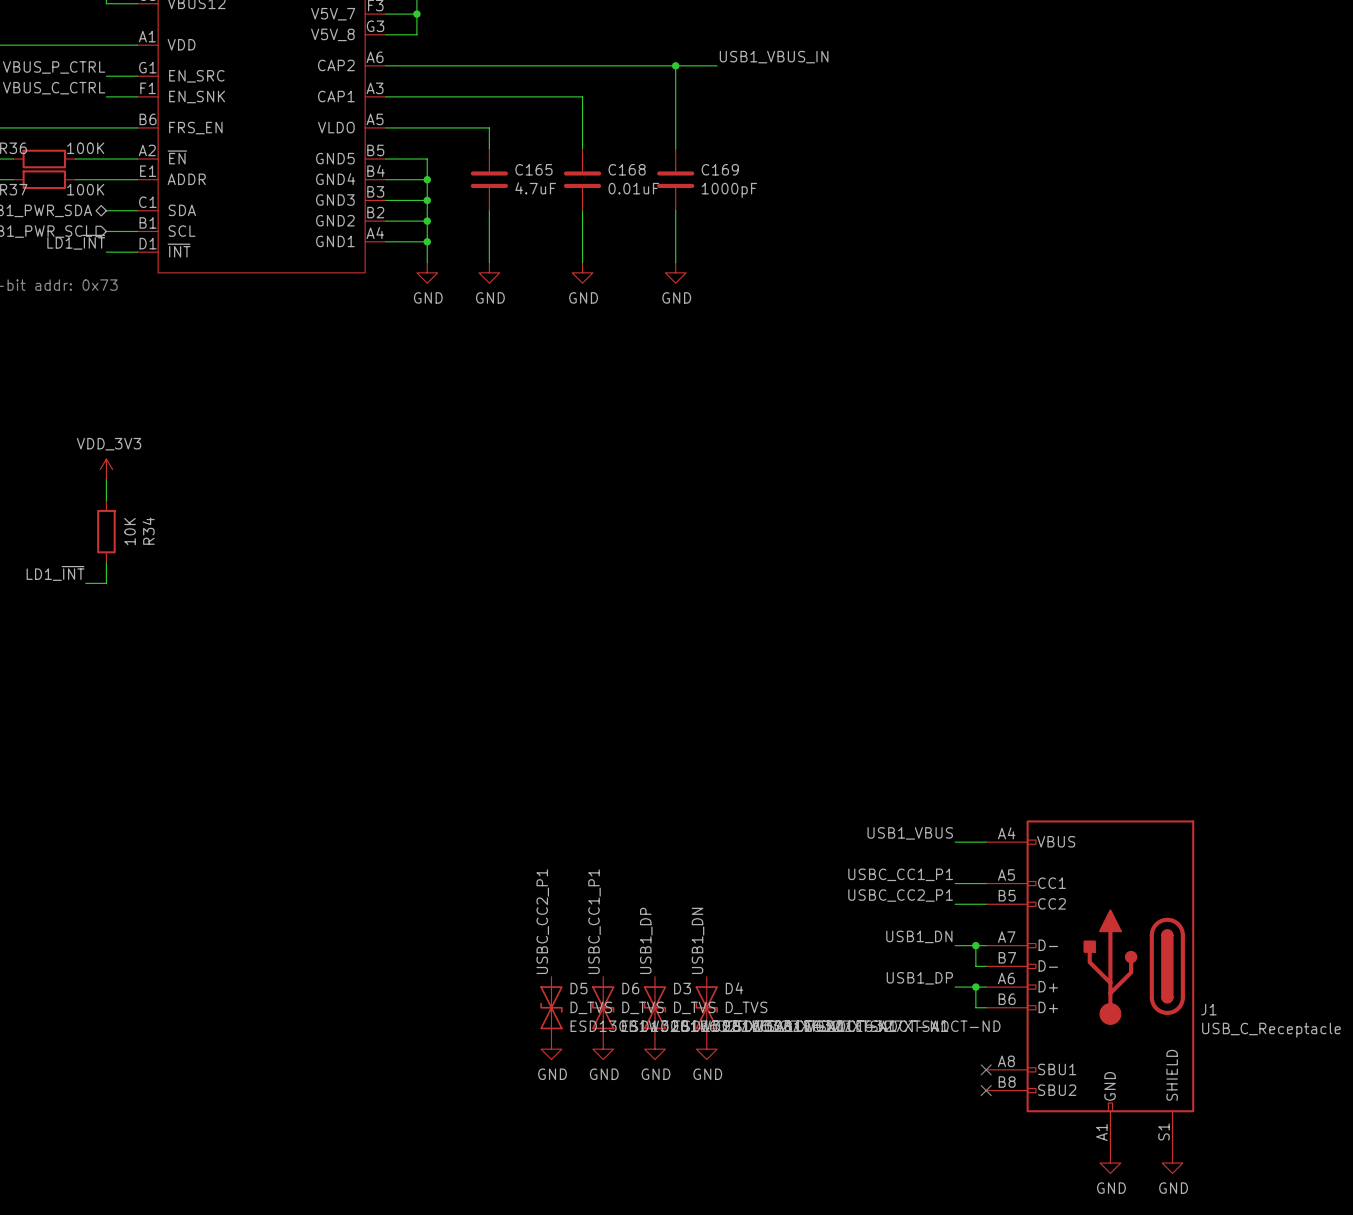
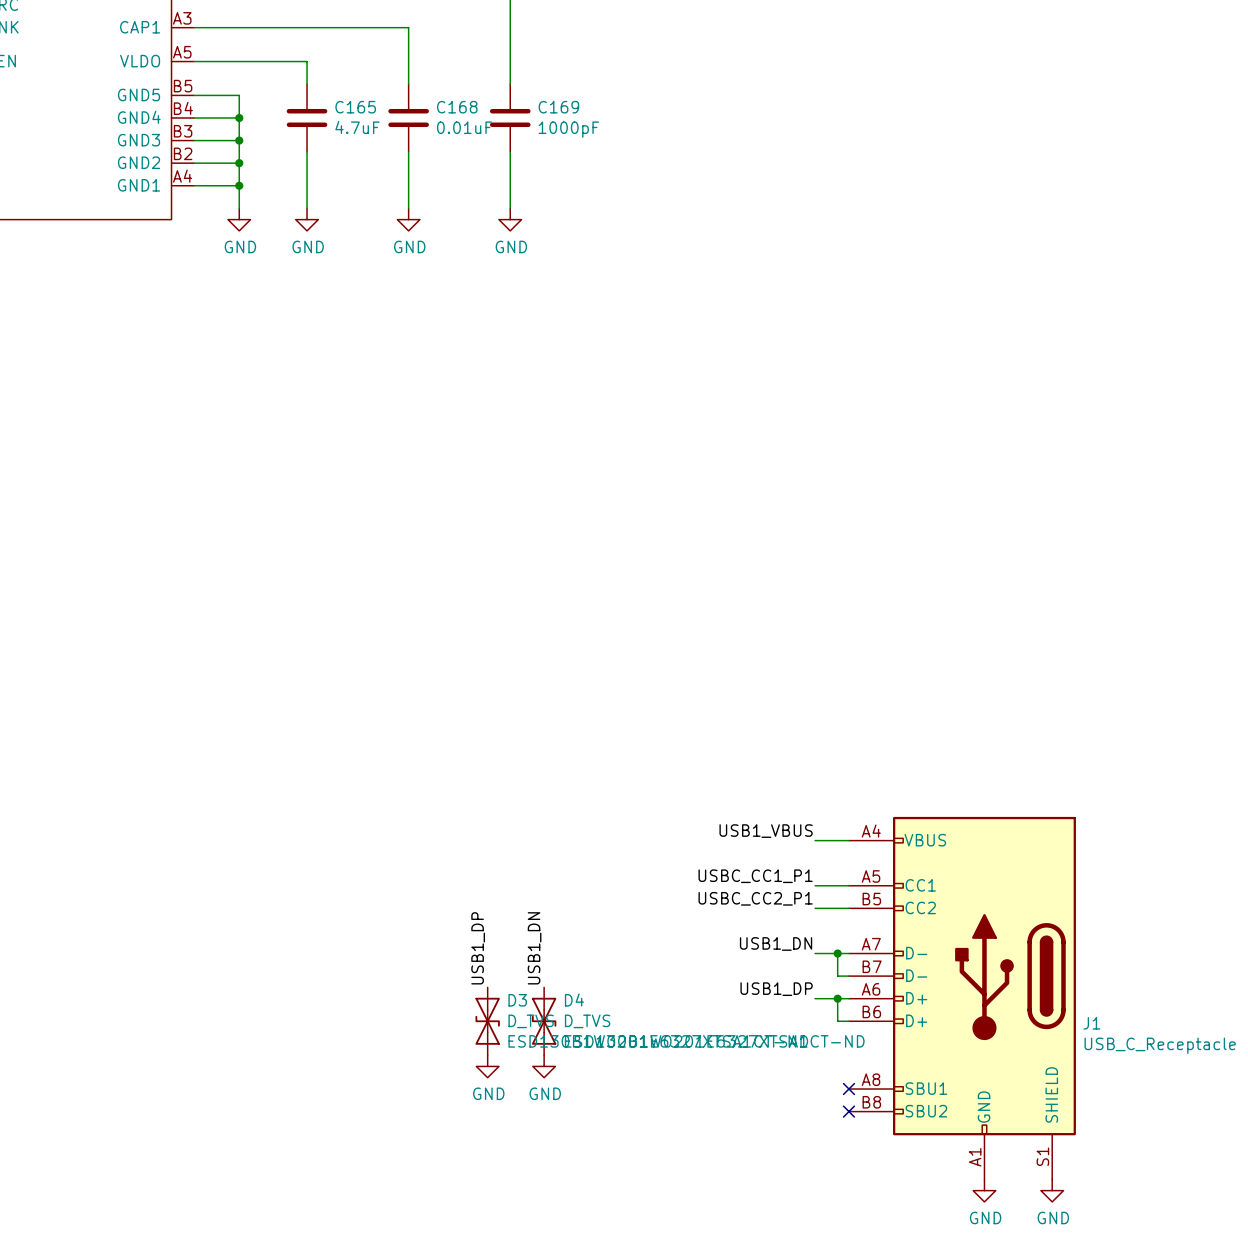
label: USBC_CC2_P1 (542, 921) -> none
label: USBC_CC1_P1 (594, 921) -> none
D5: D_TVS (551, 1007) -> none
D6: D_TVS (603, 1007) -> none
power symbol: GND (551, 1049) -> none
power symbol: GND (603, 1049) -> none

